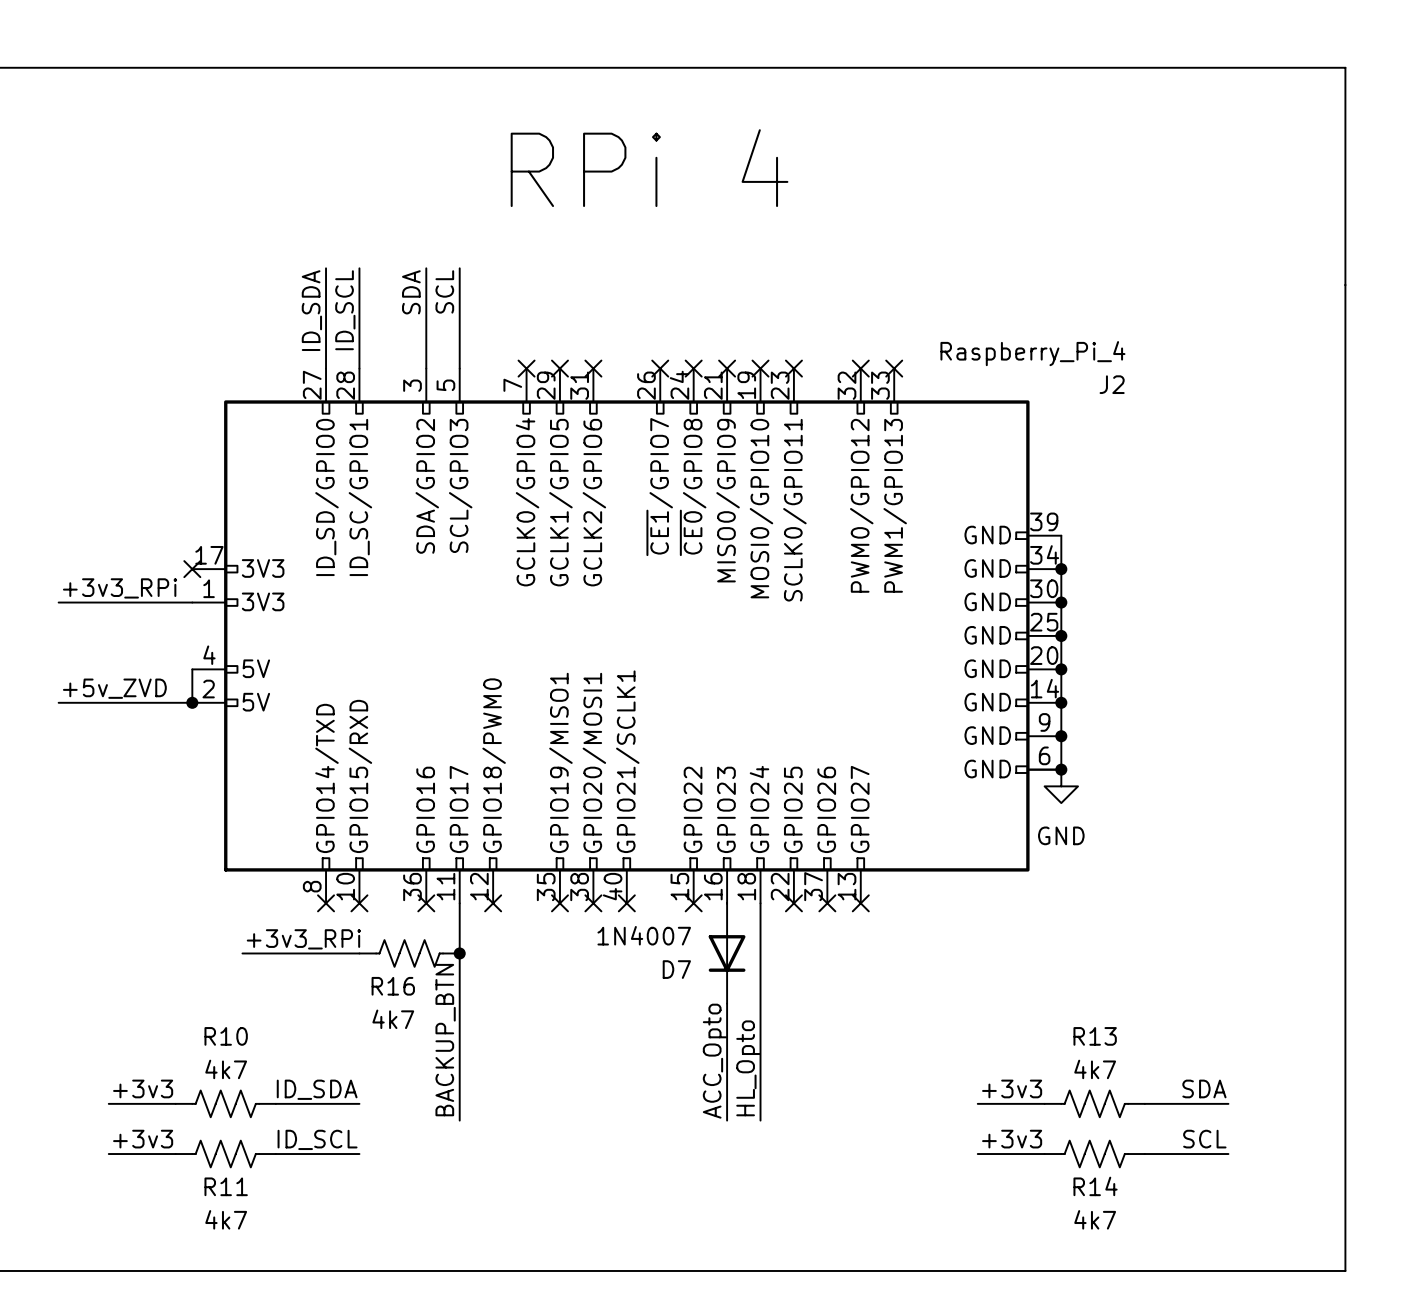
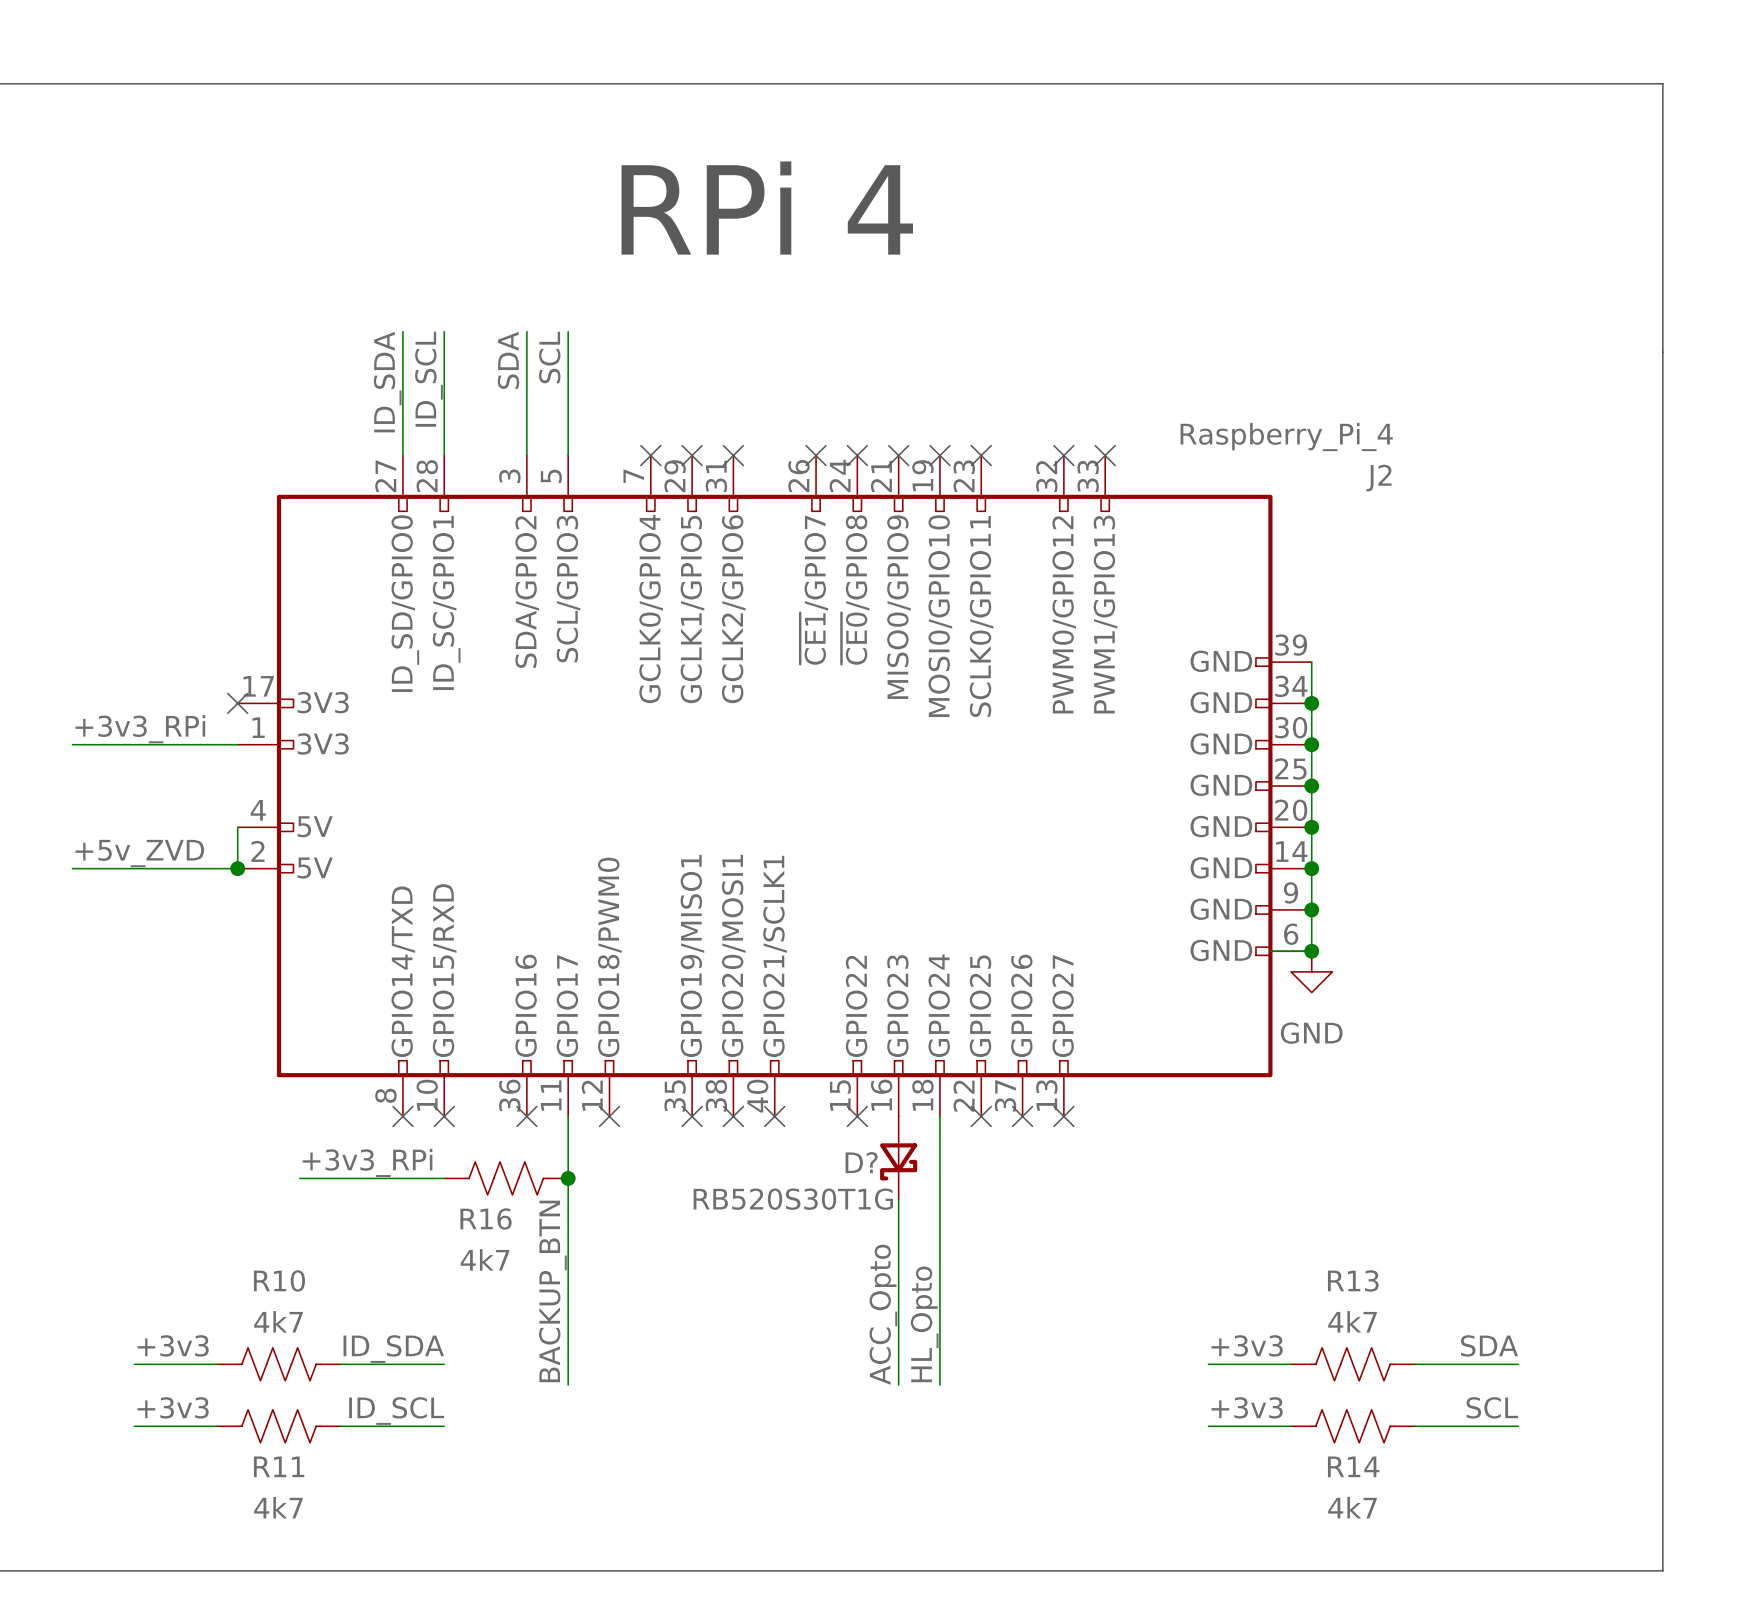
D?: none -> RB520S30T1G (898, 1157)
D7: 1N4007 (727, 953) -> none

